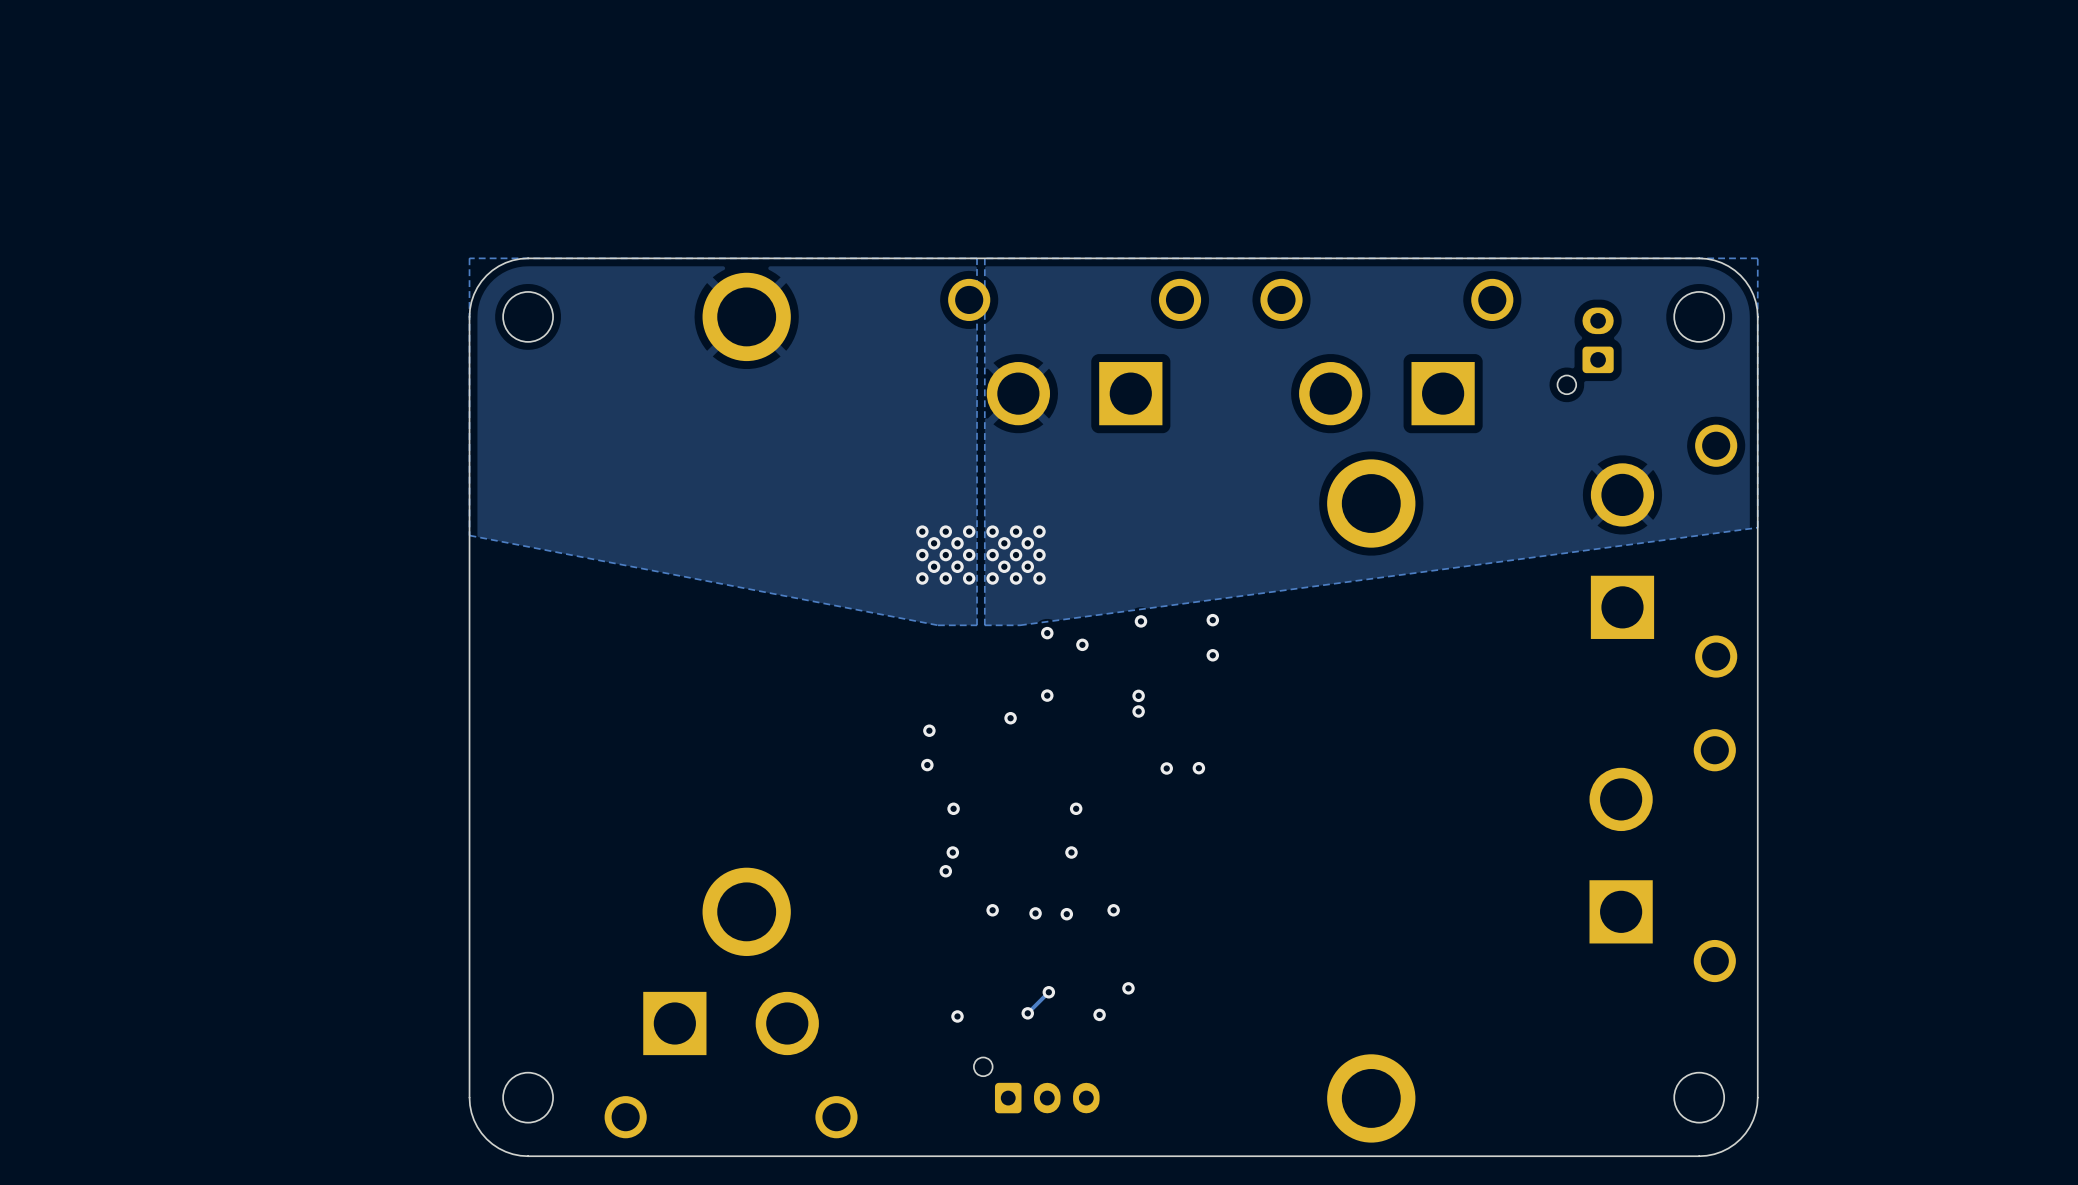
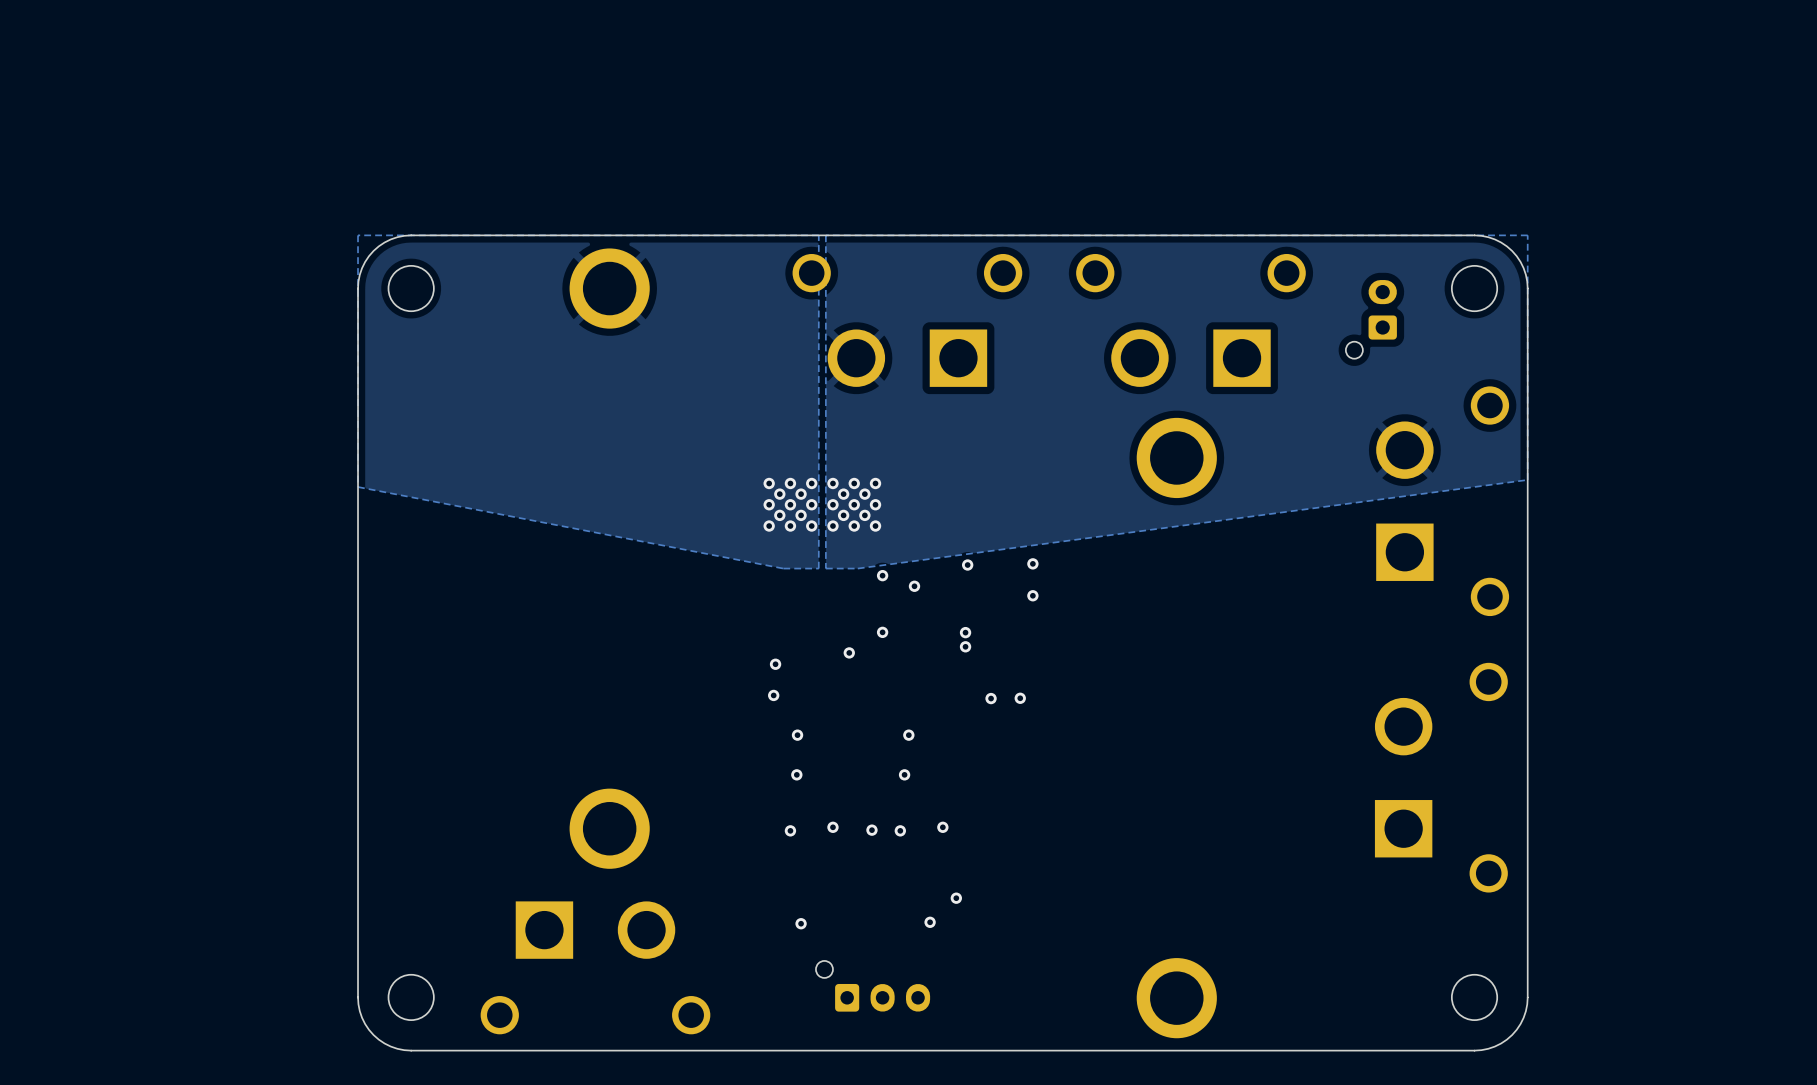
via position: (945, 871) -> (790, 830)
track: (1048, 992) (1027, 1013) -> none
via: (1048, 992) -> none
via: (1027, 1013) -> none

